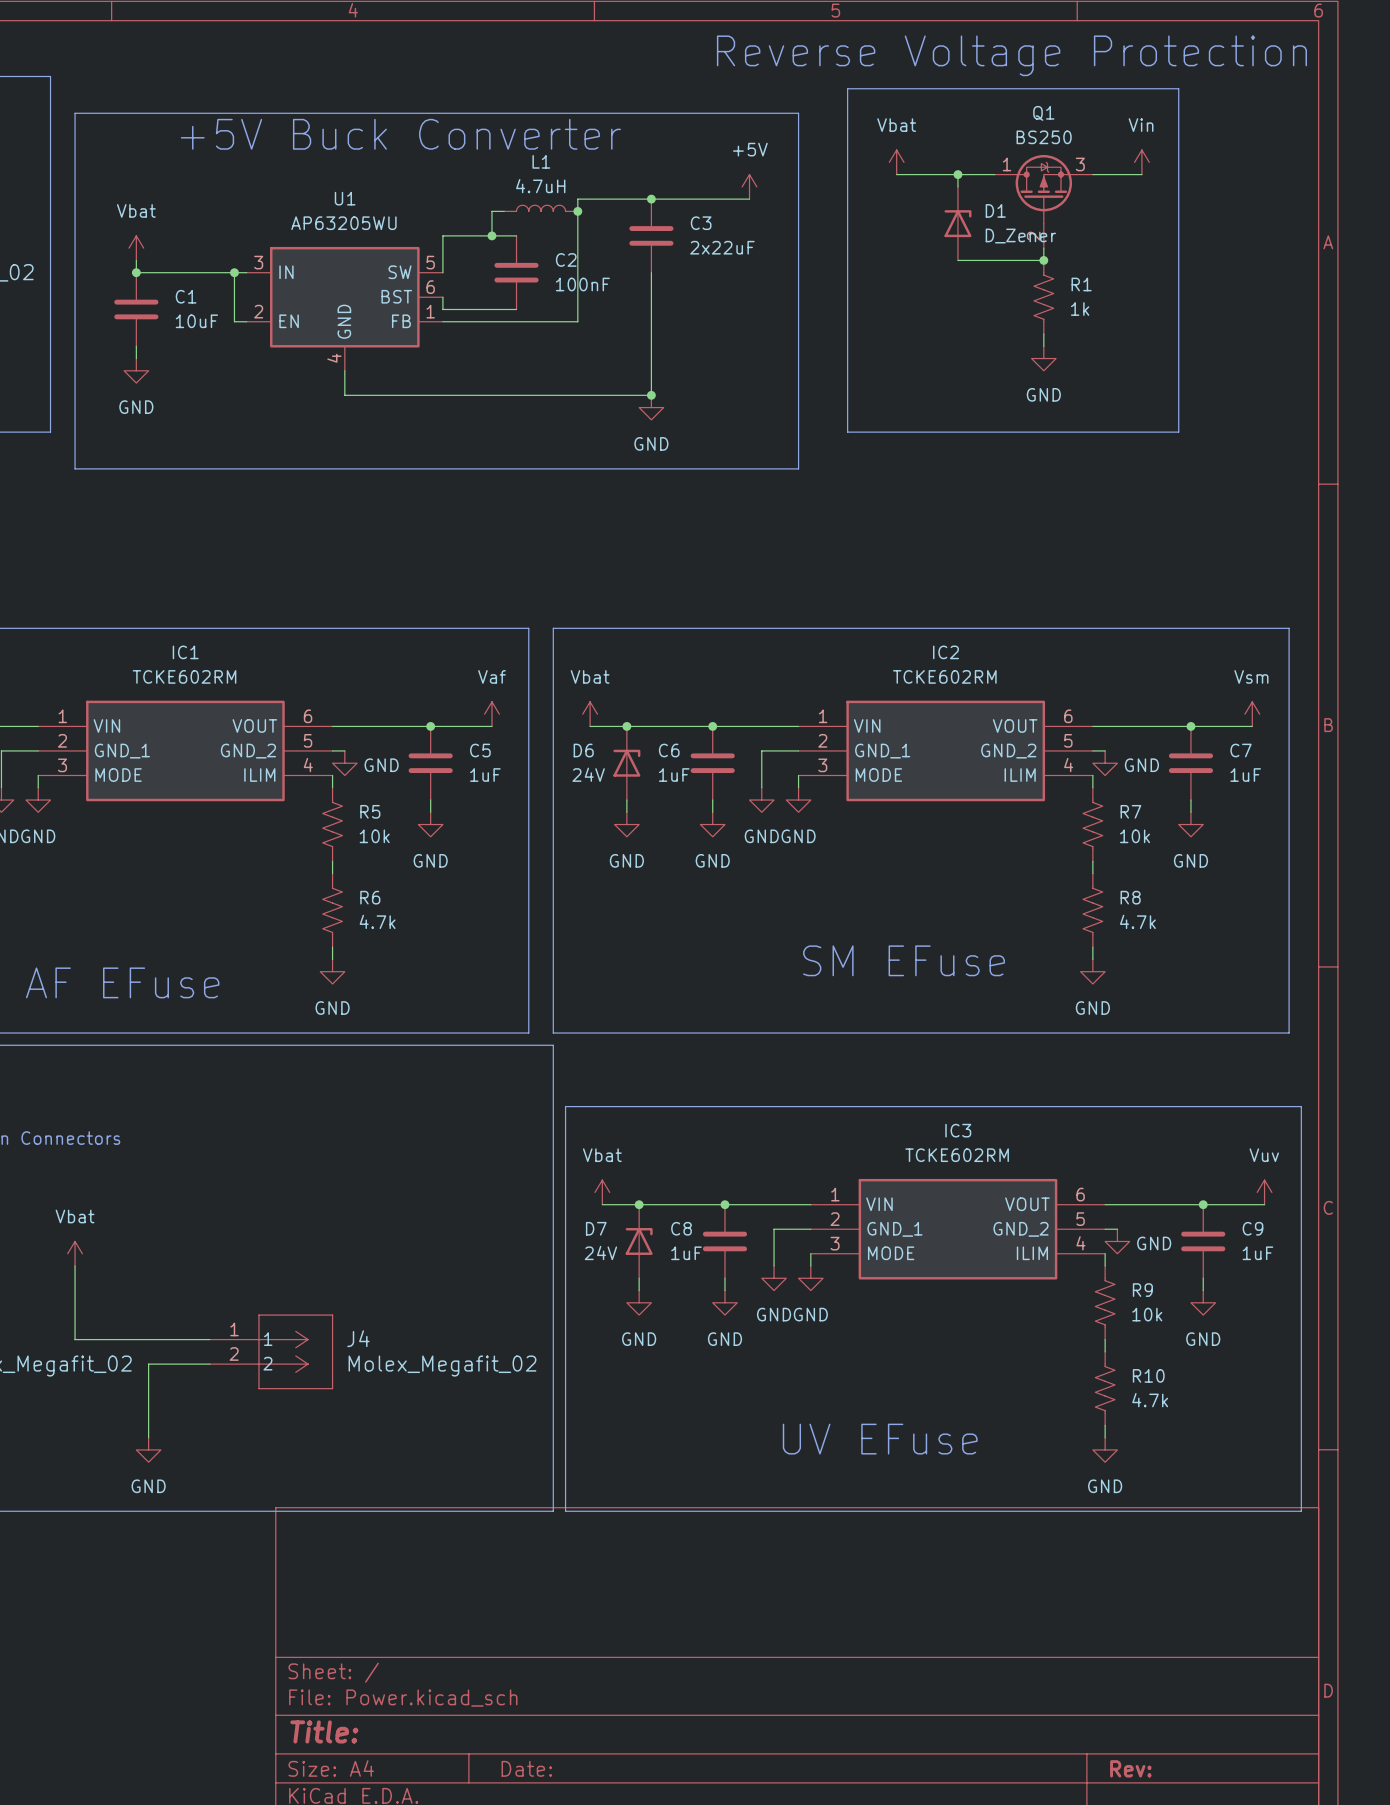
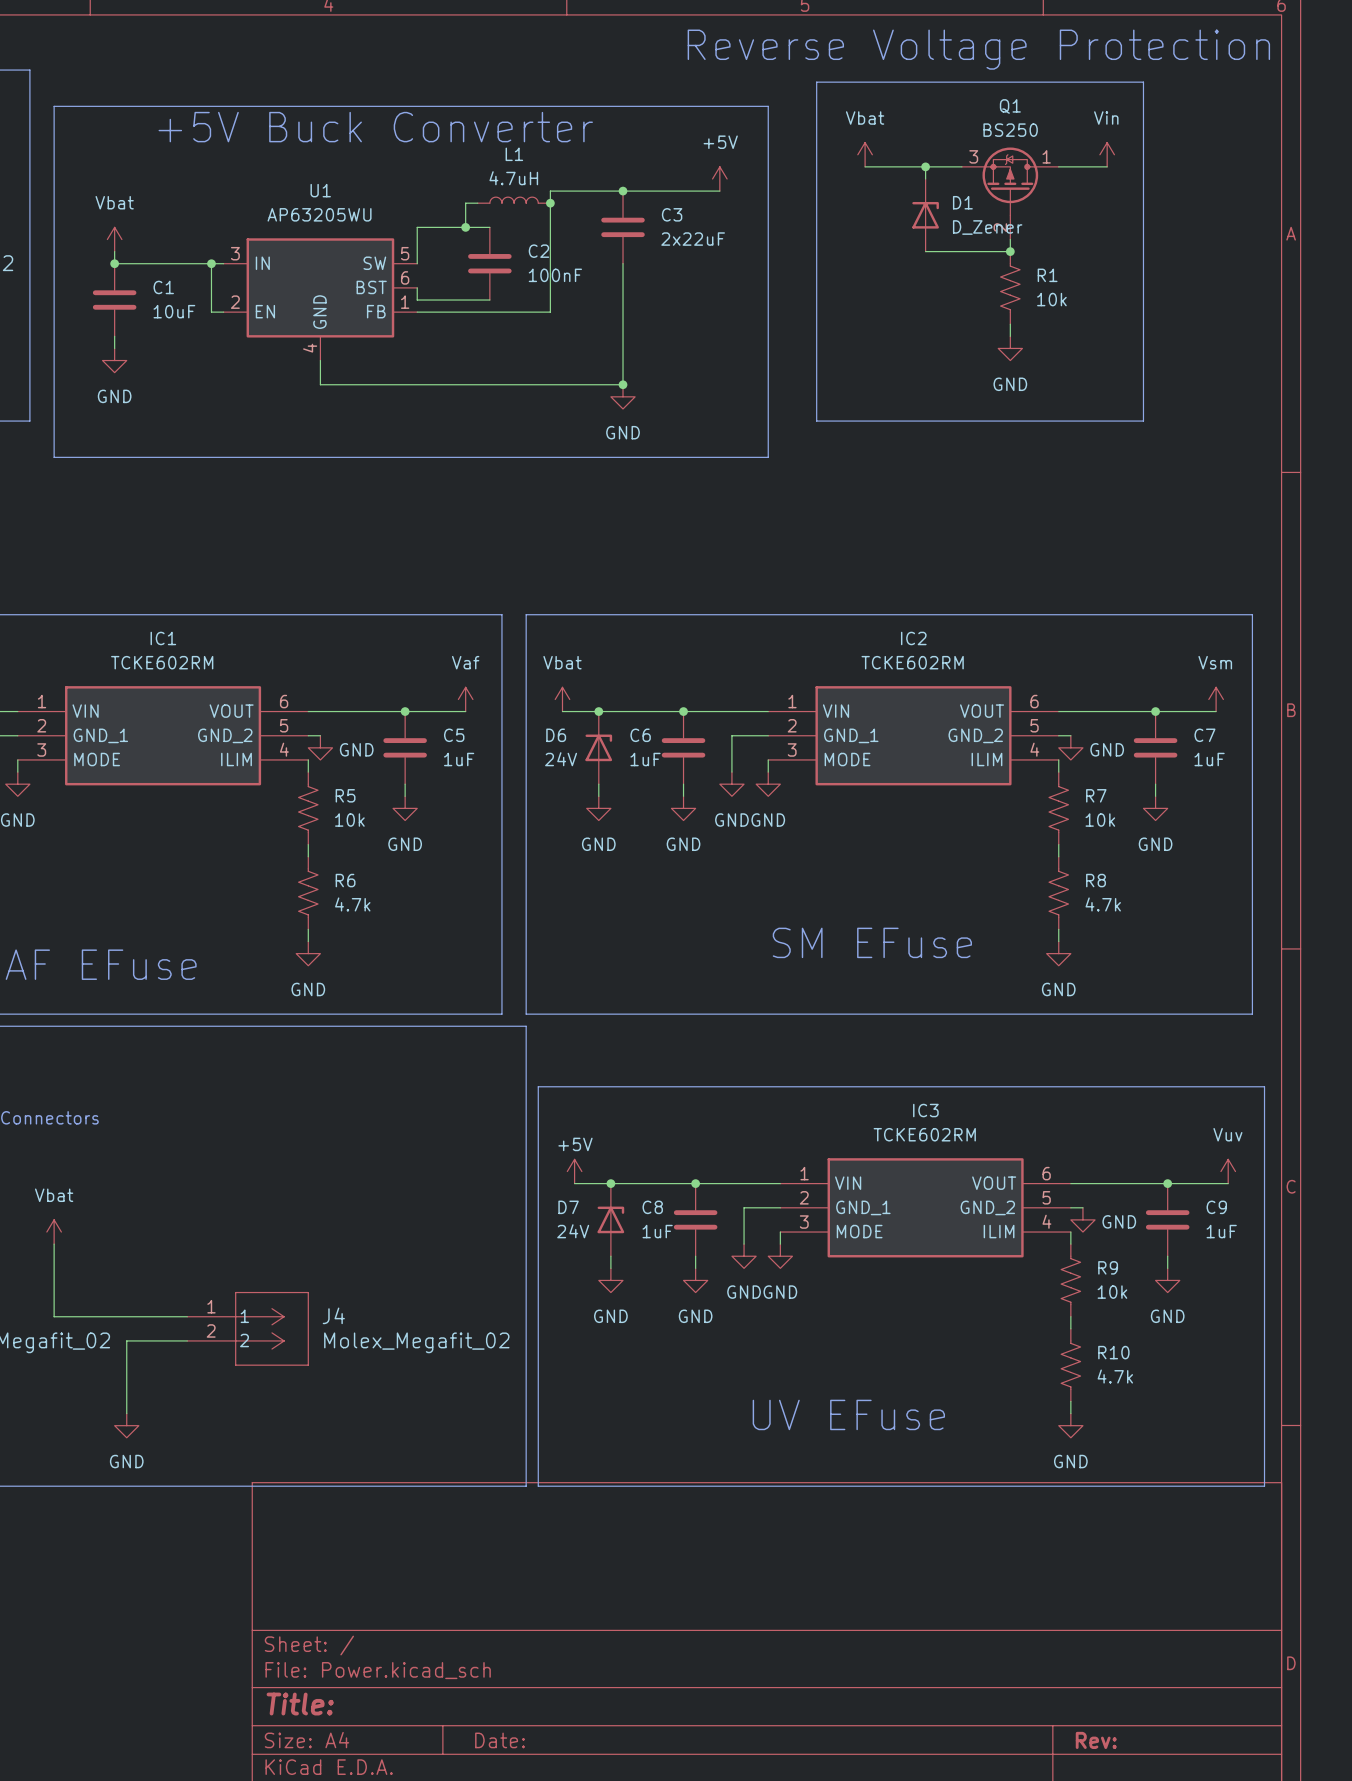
Q1 flip: as is (1043, 189) -> left-right (1010, 181)
R1 value: 1k (1080, 309) -> 10k (1051, 299)
power symbol: Vbat (602, 1192) -> +5V (574, 1171)

